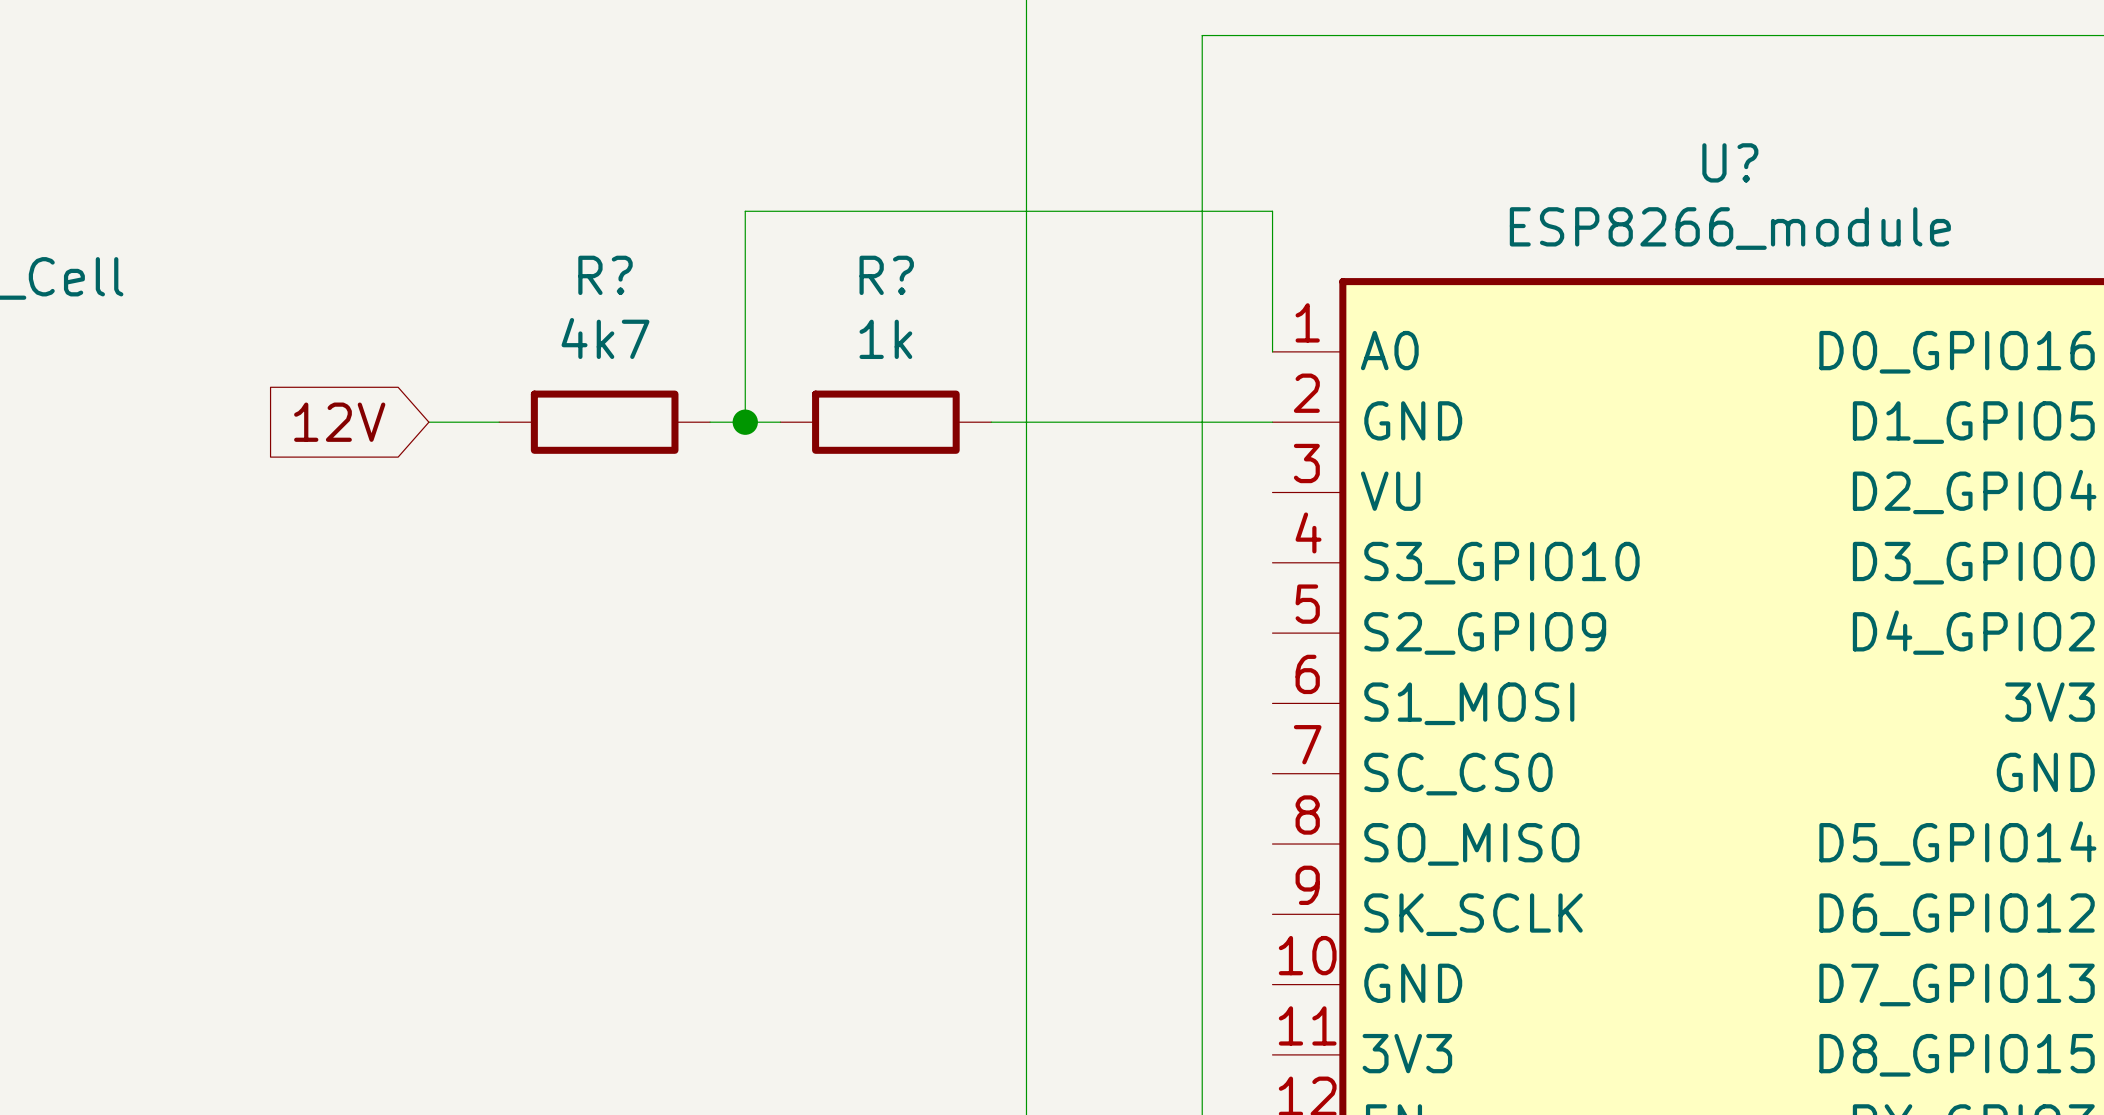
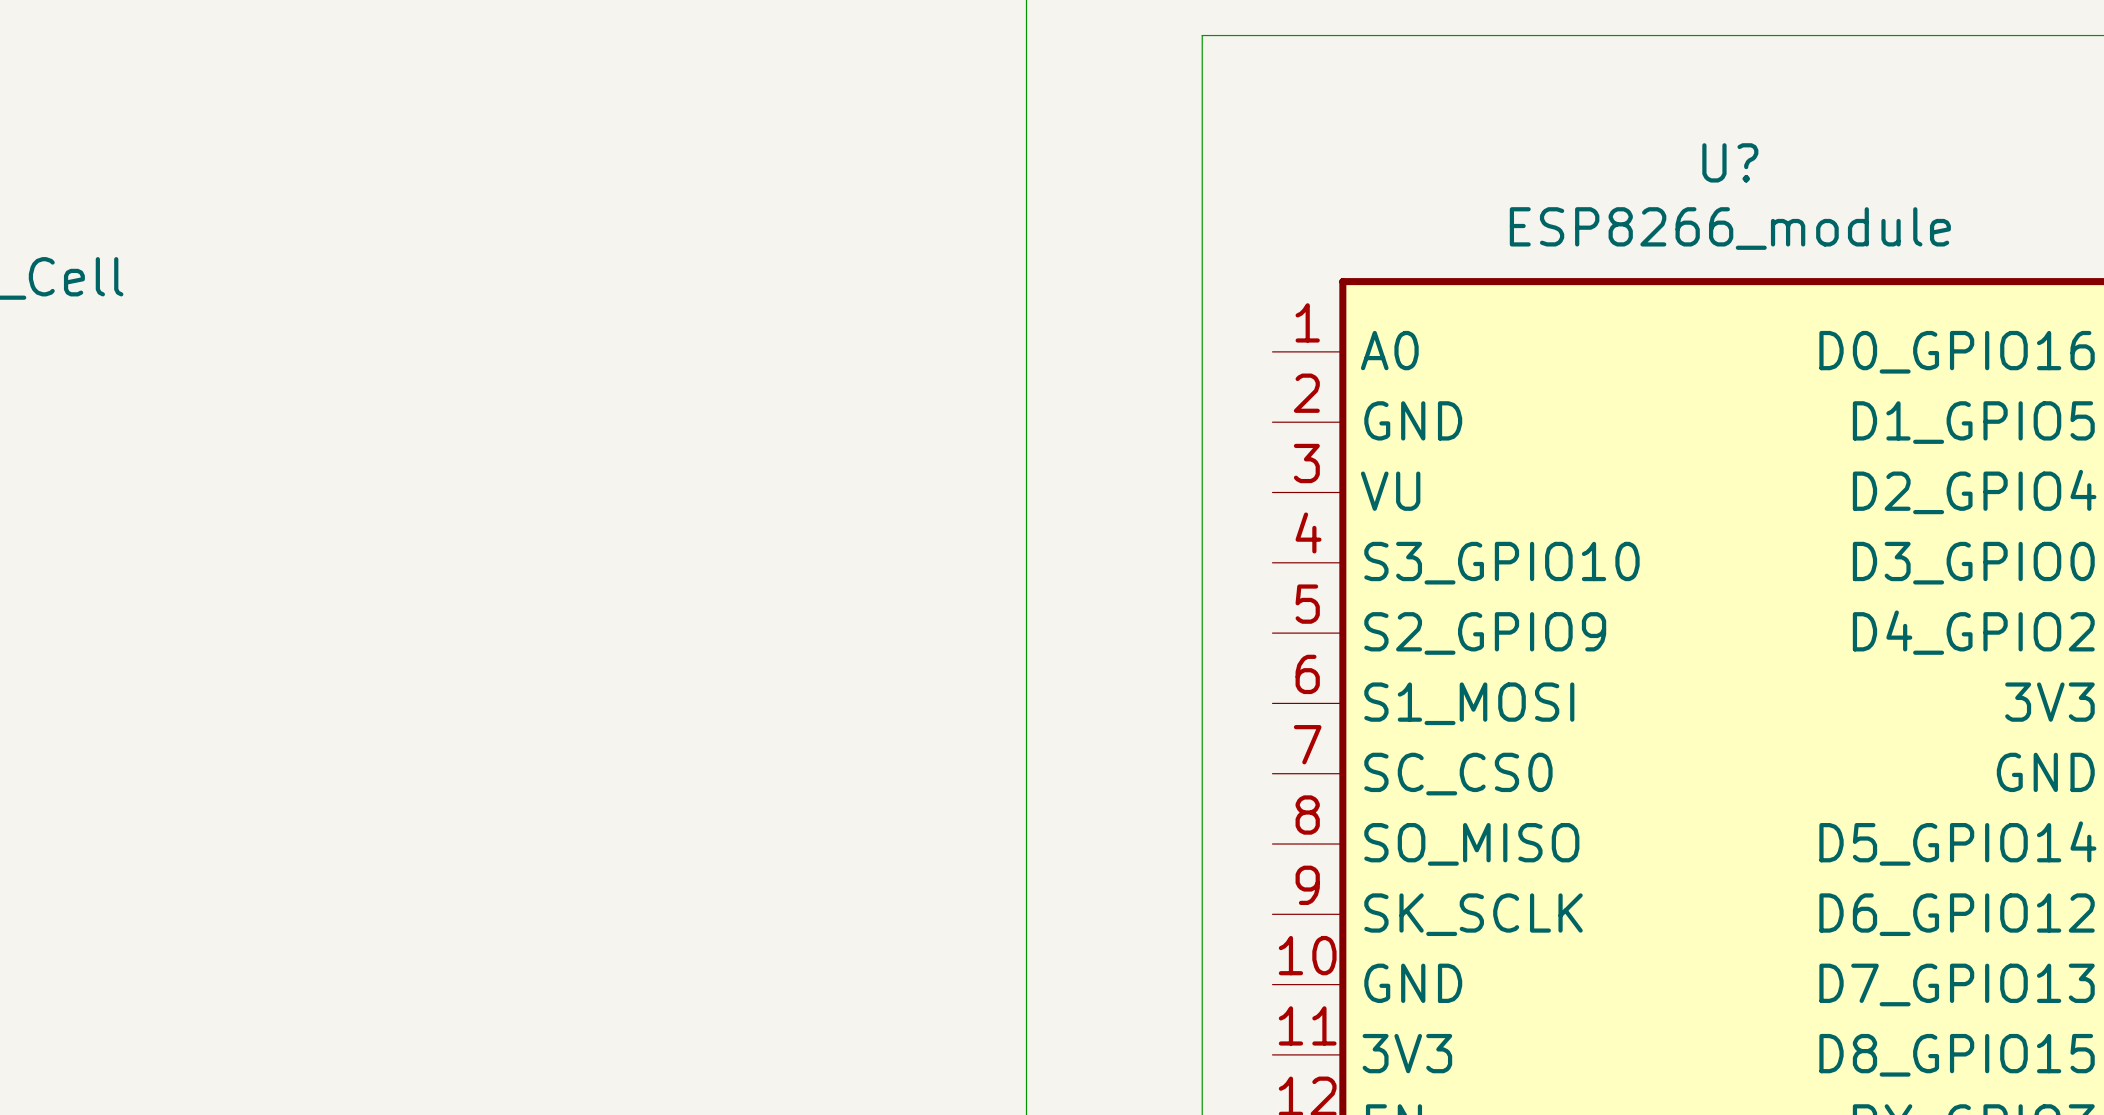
wire: (1272, 351) (1272, 211) (745, 211) (745, 422) -> none
global label: 12V (339, 422) -> none
wire: (428, 422) (499, 422) -> none
R?: 4k7 (604, 422) -> none
wire: (710, 422) (780, 422) -> none
junction: (745, 422) -> none
R?: 1k (885, 422) -> none
wire: (991, 422) (1272, 422) -> none

